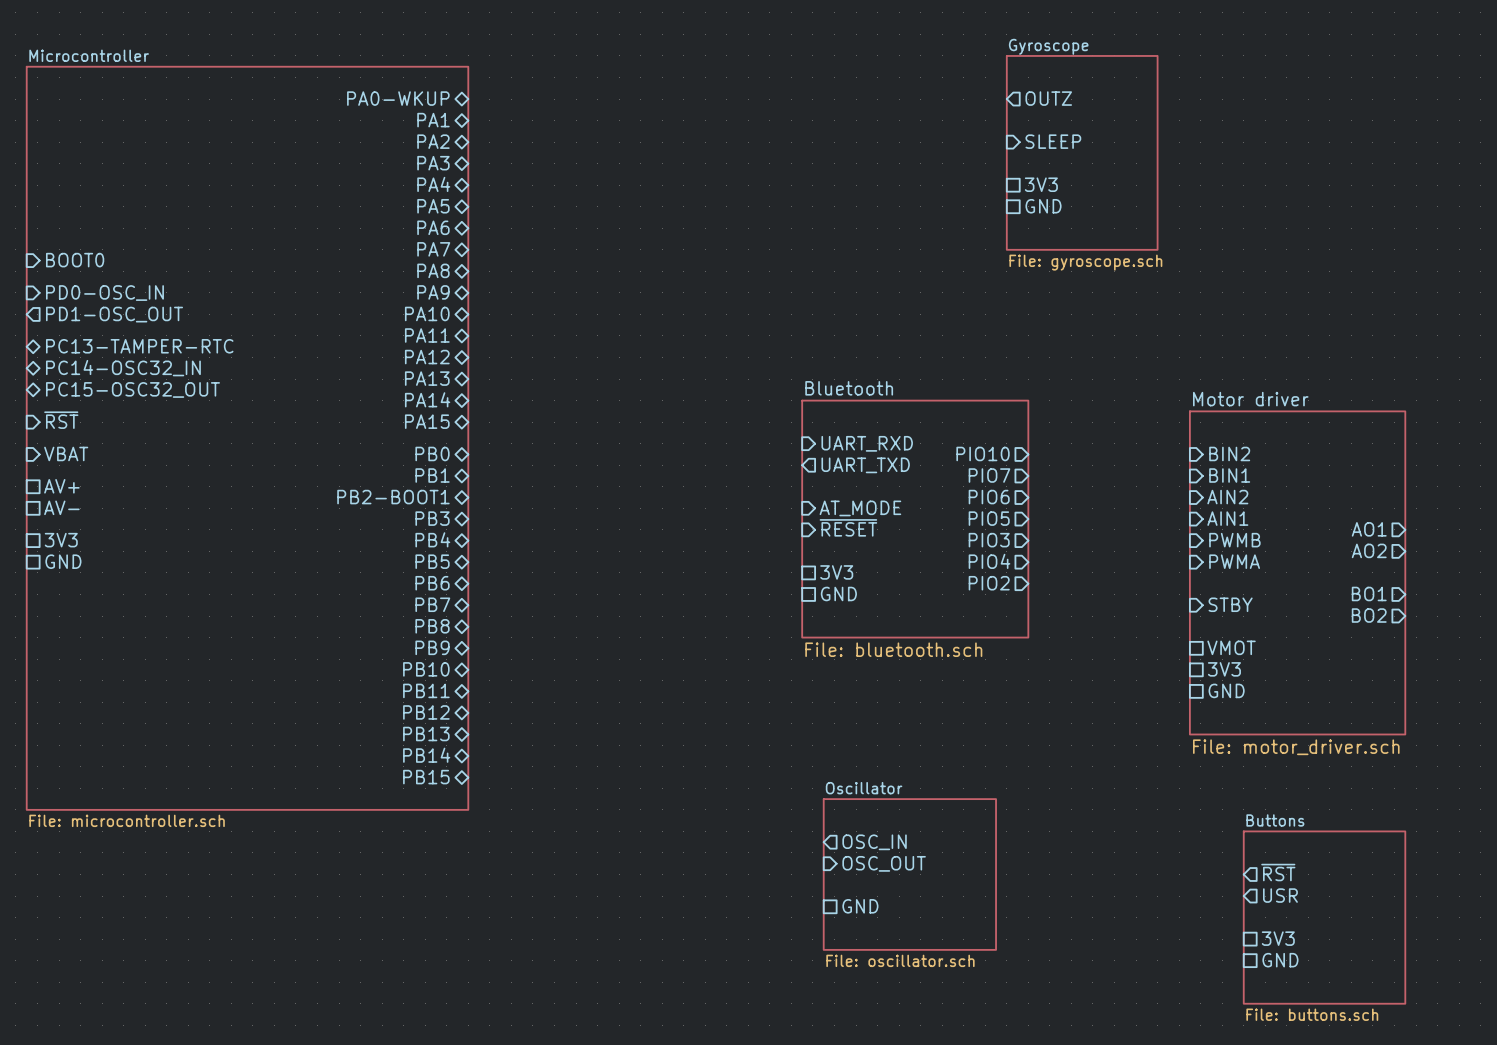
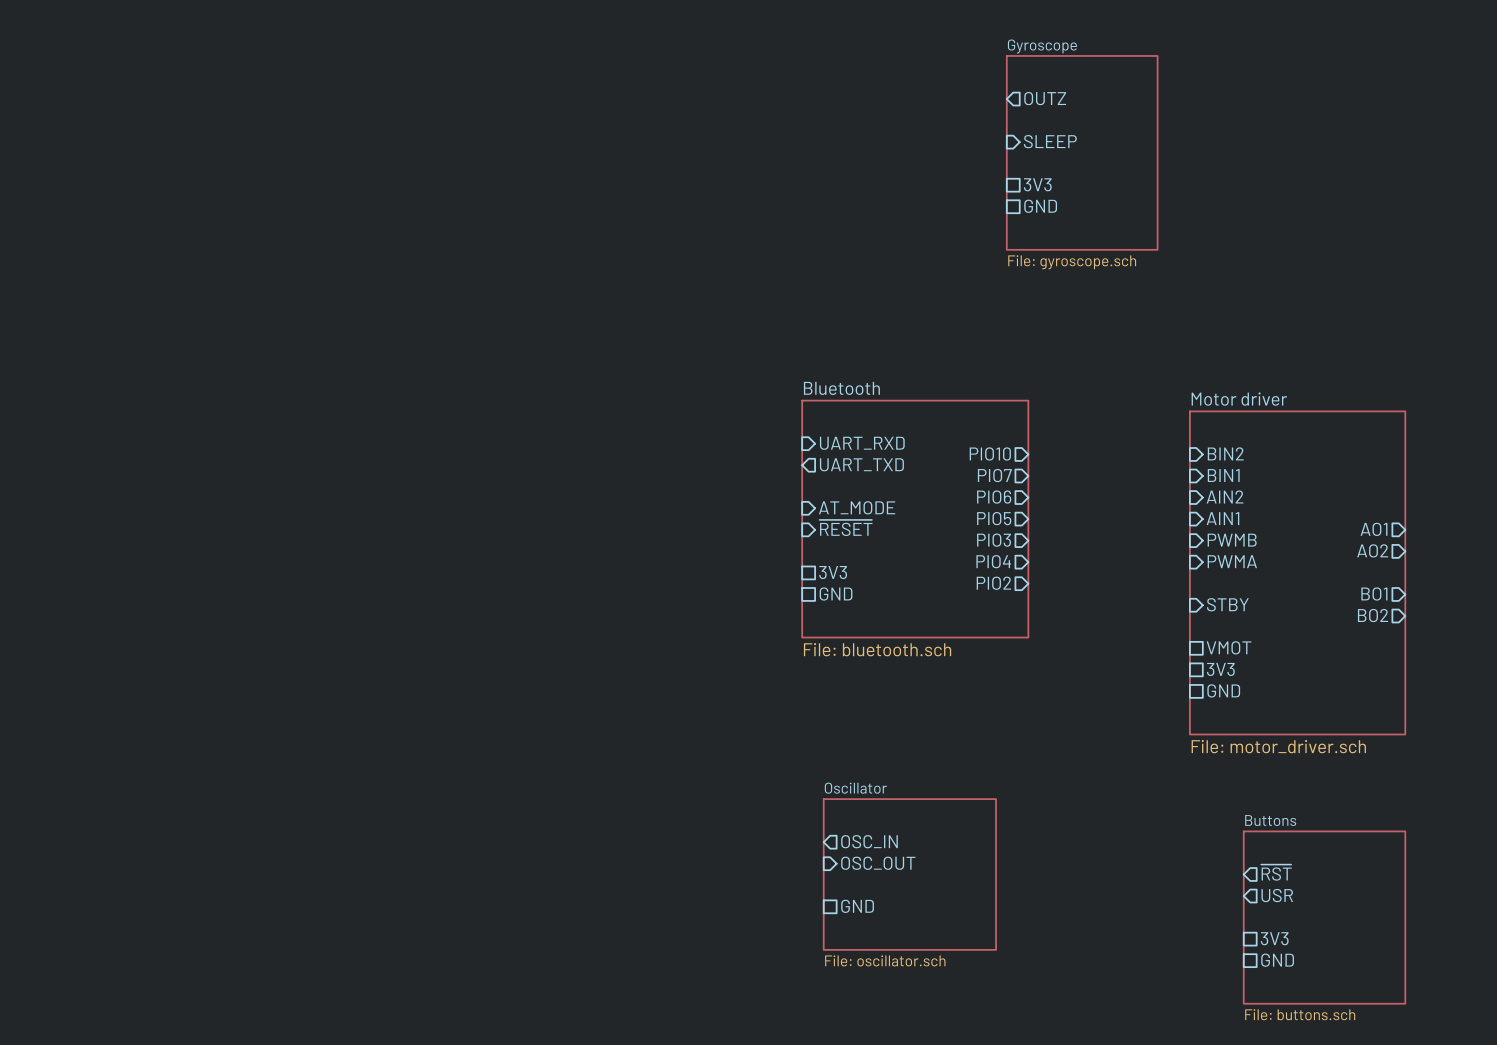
sheet pin: PA0-WKUP (398, 98) -> none
sheet pin: PA1 (433, 120) -> none
sheet pin: PA2 (433, 141) -> none
sheet pin: PA3 (433, 163) -> none
sheet pin: PA4 (433, 184) -> none
sheet pin: PA5 (433, 206) -> none
sheet pin: PA6 (433, 227) -> none
sheet pin: PA7 (433, 249) -> none
sheet pin: BOOT0 (75, 260) -> none
sheet pin: PA8 (433, 270) -> none
sheet pin: PA9 (433, 292) -> none
sheet pin: PD0-OSC_IN (104, 293) -> none
sheet pin: PA10 (427, 313) -> none
sheet pin: PD1-OSC_OUT (114, 314) -> none
sheet pin: PA11 (427, 335) -> none
sheet pin: PC13-TAMPER-RTC (139, 346) -> none
sheet pin: PA12 (427, 357) -> none
sheet pin: PC14-OSC32_IN (123, 368) -> none
sheet pin: PA13 (427, 378) -> none
sheet pin: PC15-OSC32_OUT (132, 389) -> none
sheet pin: PA14 (427, 399) -> none
sheet pin: ~{RST} (61, 420) -> none
sheet pin: PA15 (427, 421) -> none
sheet Microcontroller: File: microcontroller.sch (247, 438) -> none
sheet pin: VBAT (66, 453) -> none
sheet pin: PB0 (432, 453) -> none
sheet pin: PB1 (432, 475) -> none
sheet pin: AV+ (61, 486) -> none
sheet pin: PB2-BOOT1 (393, 497) -> none
sheet pin: AV- (61, 507) -> none
sheet pin: PB3 (432, 518) -> none
sheet pin: PB4 (432, 539) -> none
sheet pin: 3V3 (61, 540) -> none
sheet pin: GND (63, 561) -> none
sheet pin: PB5 (432, 561) -> none
sheet pin: PB6 (432, 583) -> none
sheet pin: PB7 (432, 604) -> none
sheet pin: PB8 (432, 626) -> none
sheet pin: PB9 (432, 647) -> none
sheet pin: PB10 (426, 669) -> none
sheet pin: PB11 (426, 690) -> none
sheet pin: PB12 (426, 712) -> none
sheet pin: PB13 (426, 734) -> none
sheet pin: PB14 (426, 755) -> none
sheet pin: PB15 (426, 777) -> none

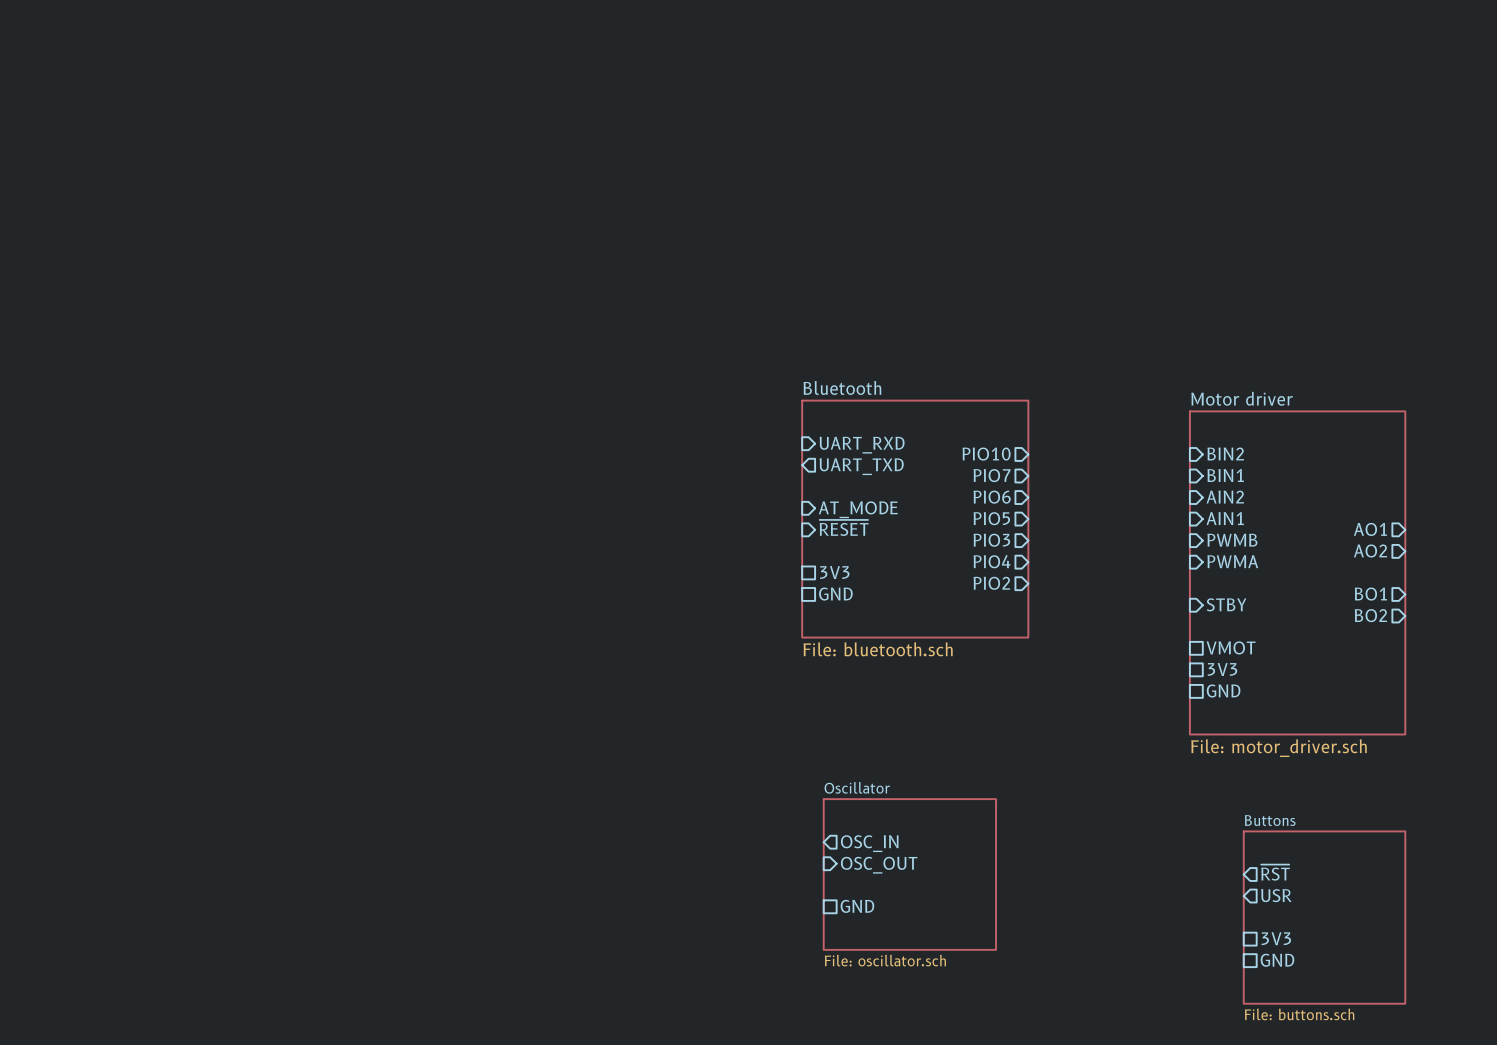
sheet pin: OUTZ (1045, 98) -> none
sheet pin: SLEEP (1050, 141) -> none
sheet Gyroscope: File: gyroscope.sch (1082, 152) -> none
sheet pin: 3V3 (1037, 184) -> none
sheet pin: GND (1040, 206) -> none

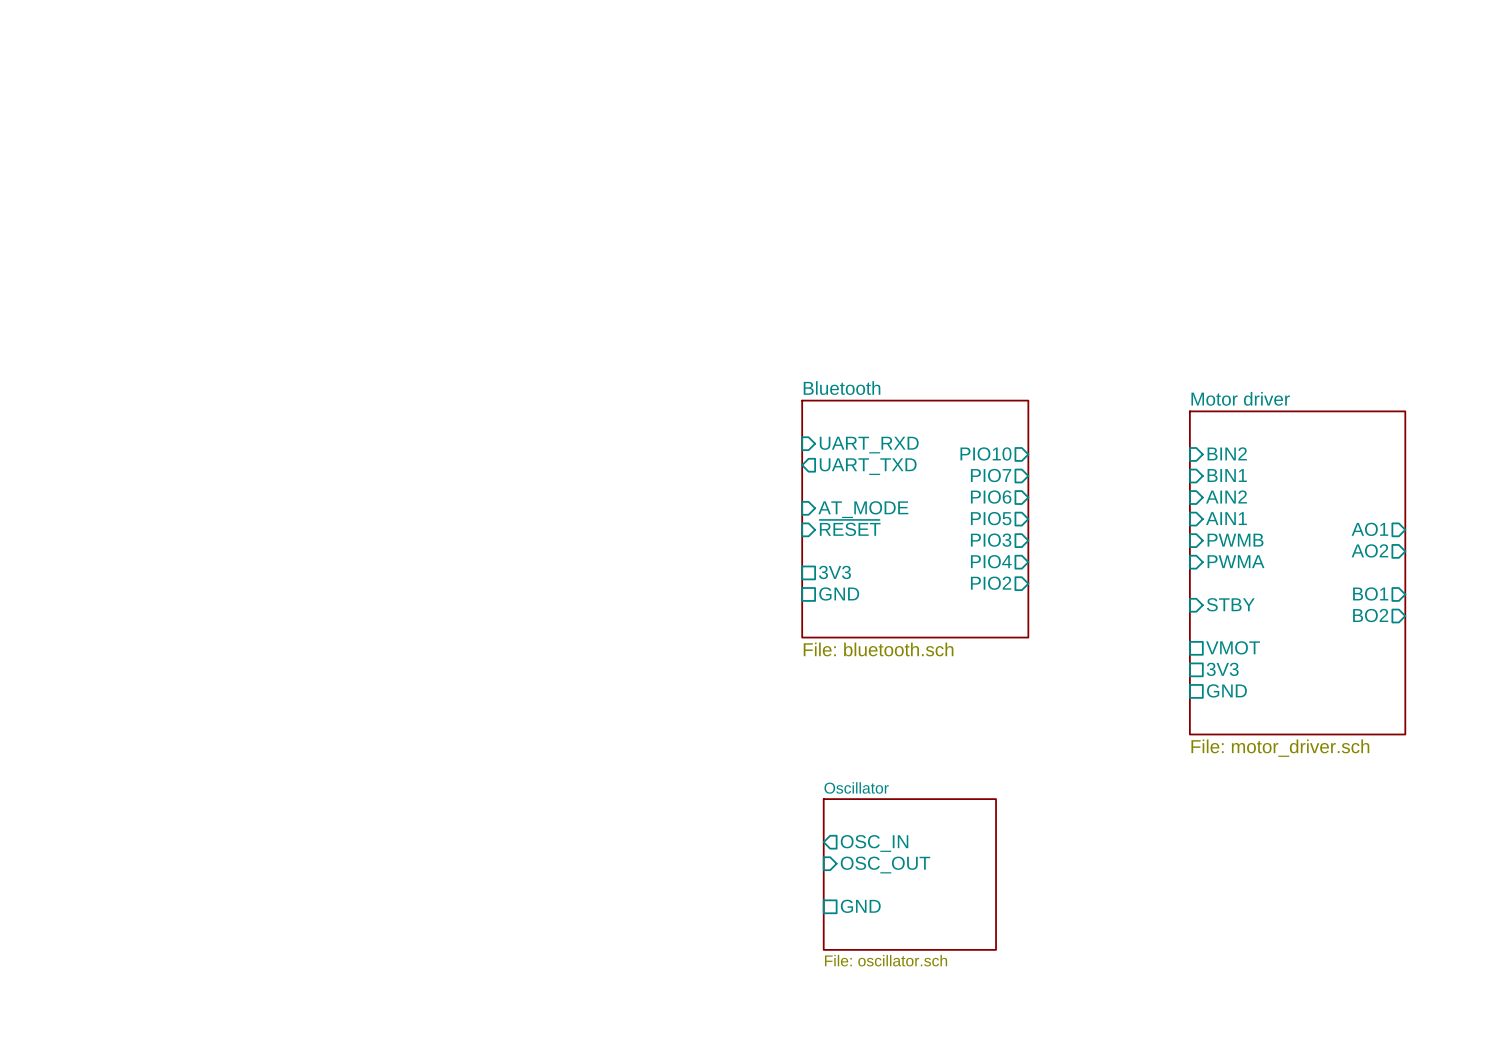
sheet pin: ~{RST} (1275, 872) -> none
sheet pin: USR (1276, 895) -> none
sheet Buttons: File: buttons.sch (1324, 917) -> none
sheet pin: 3V3 (1276, 938) -> none
sheet pin: GND (1277, 960) -> none

